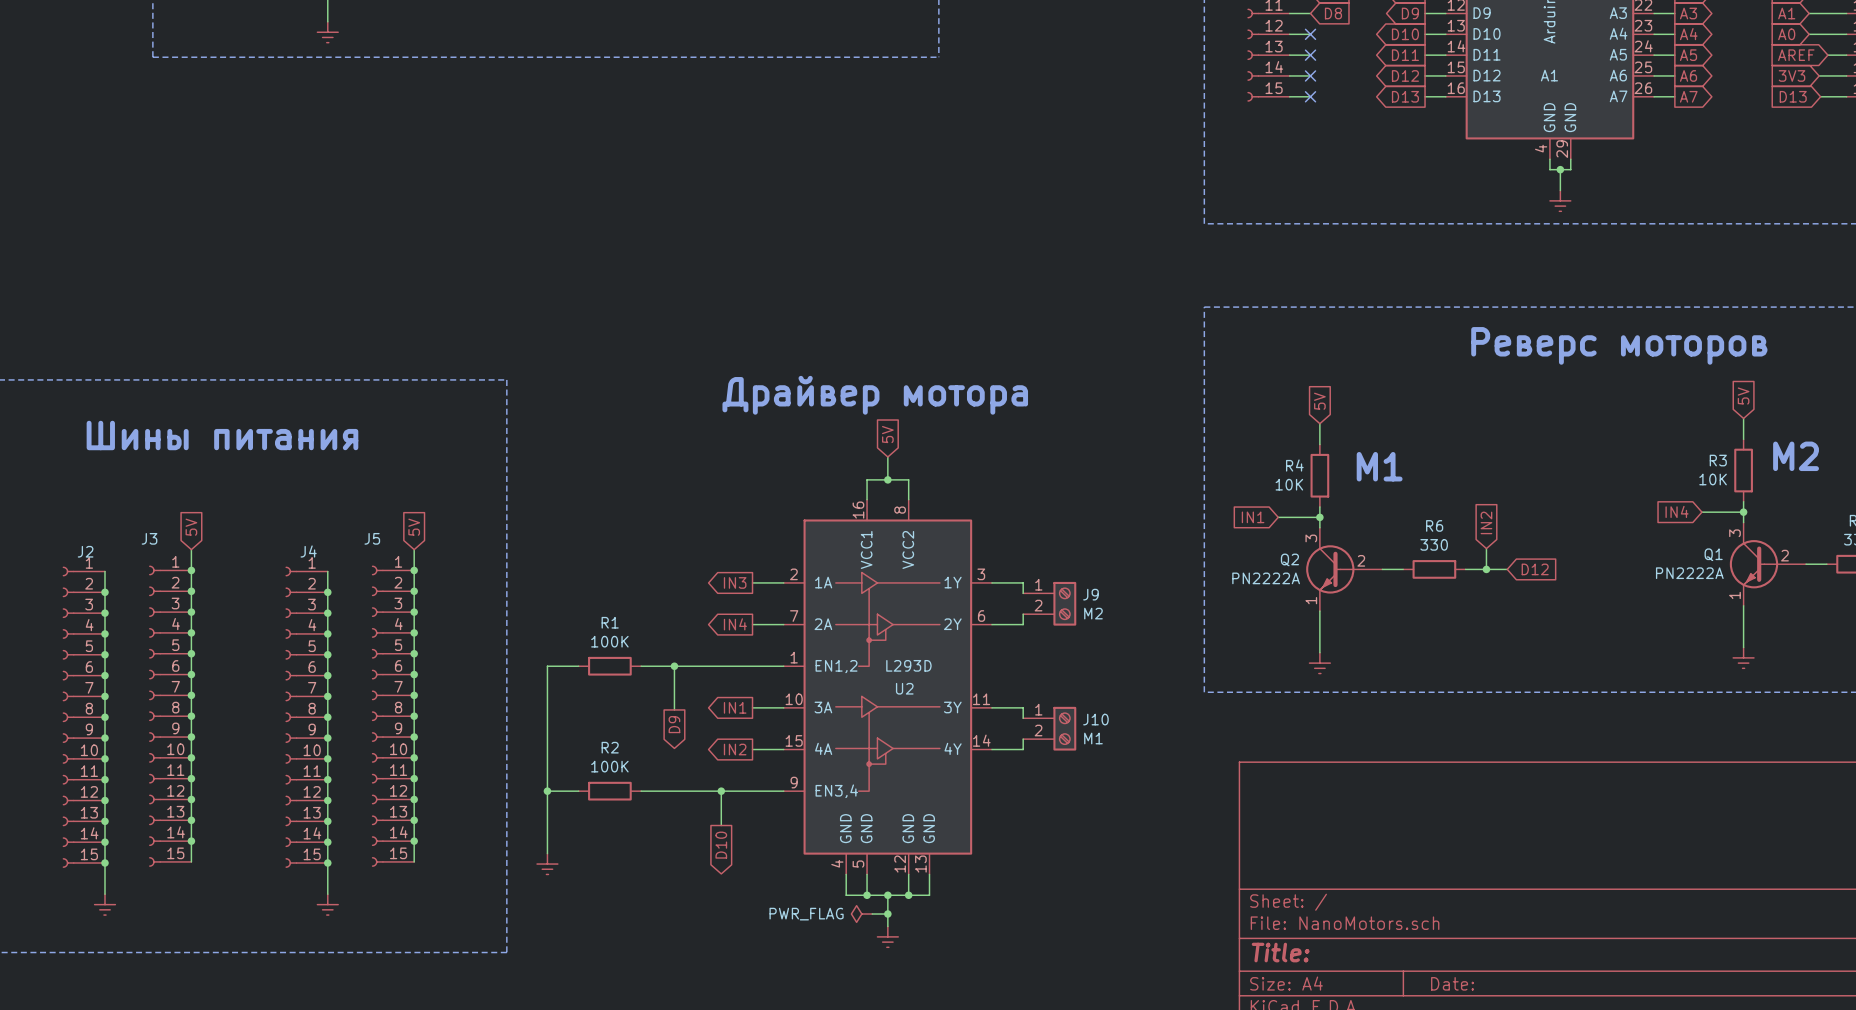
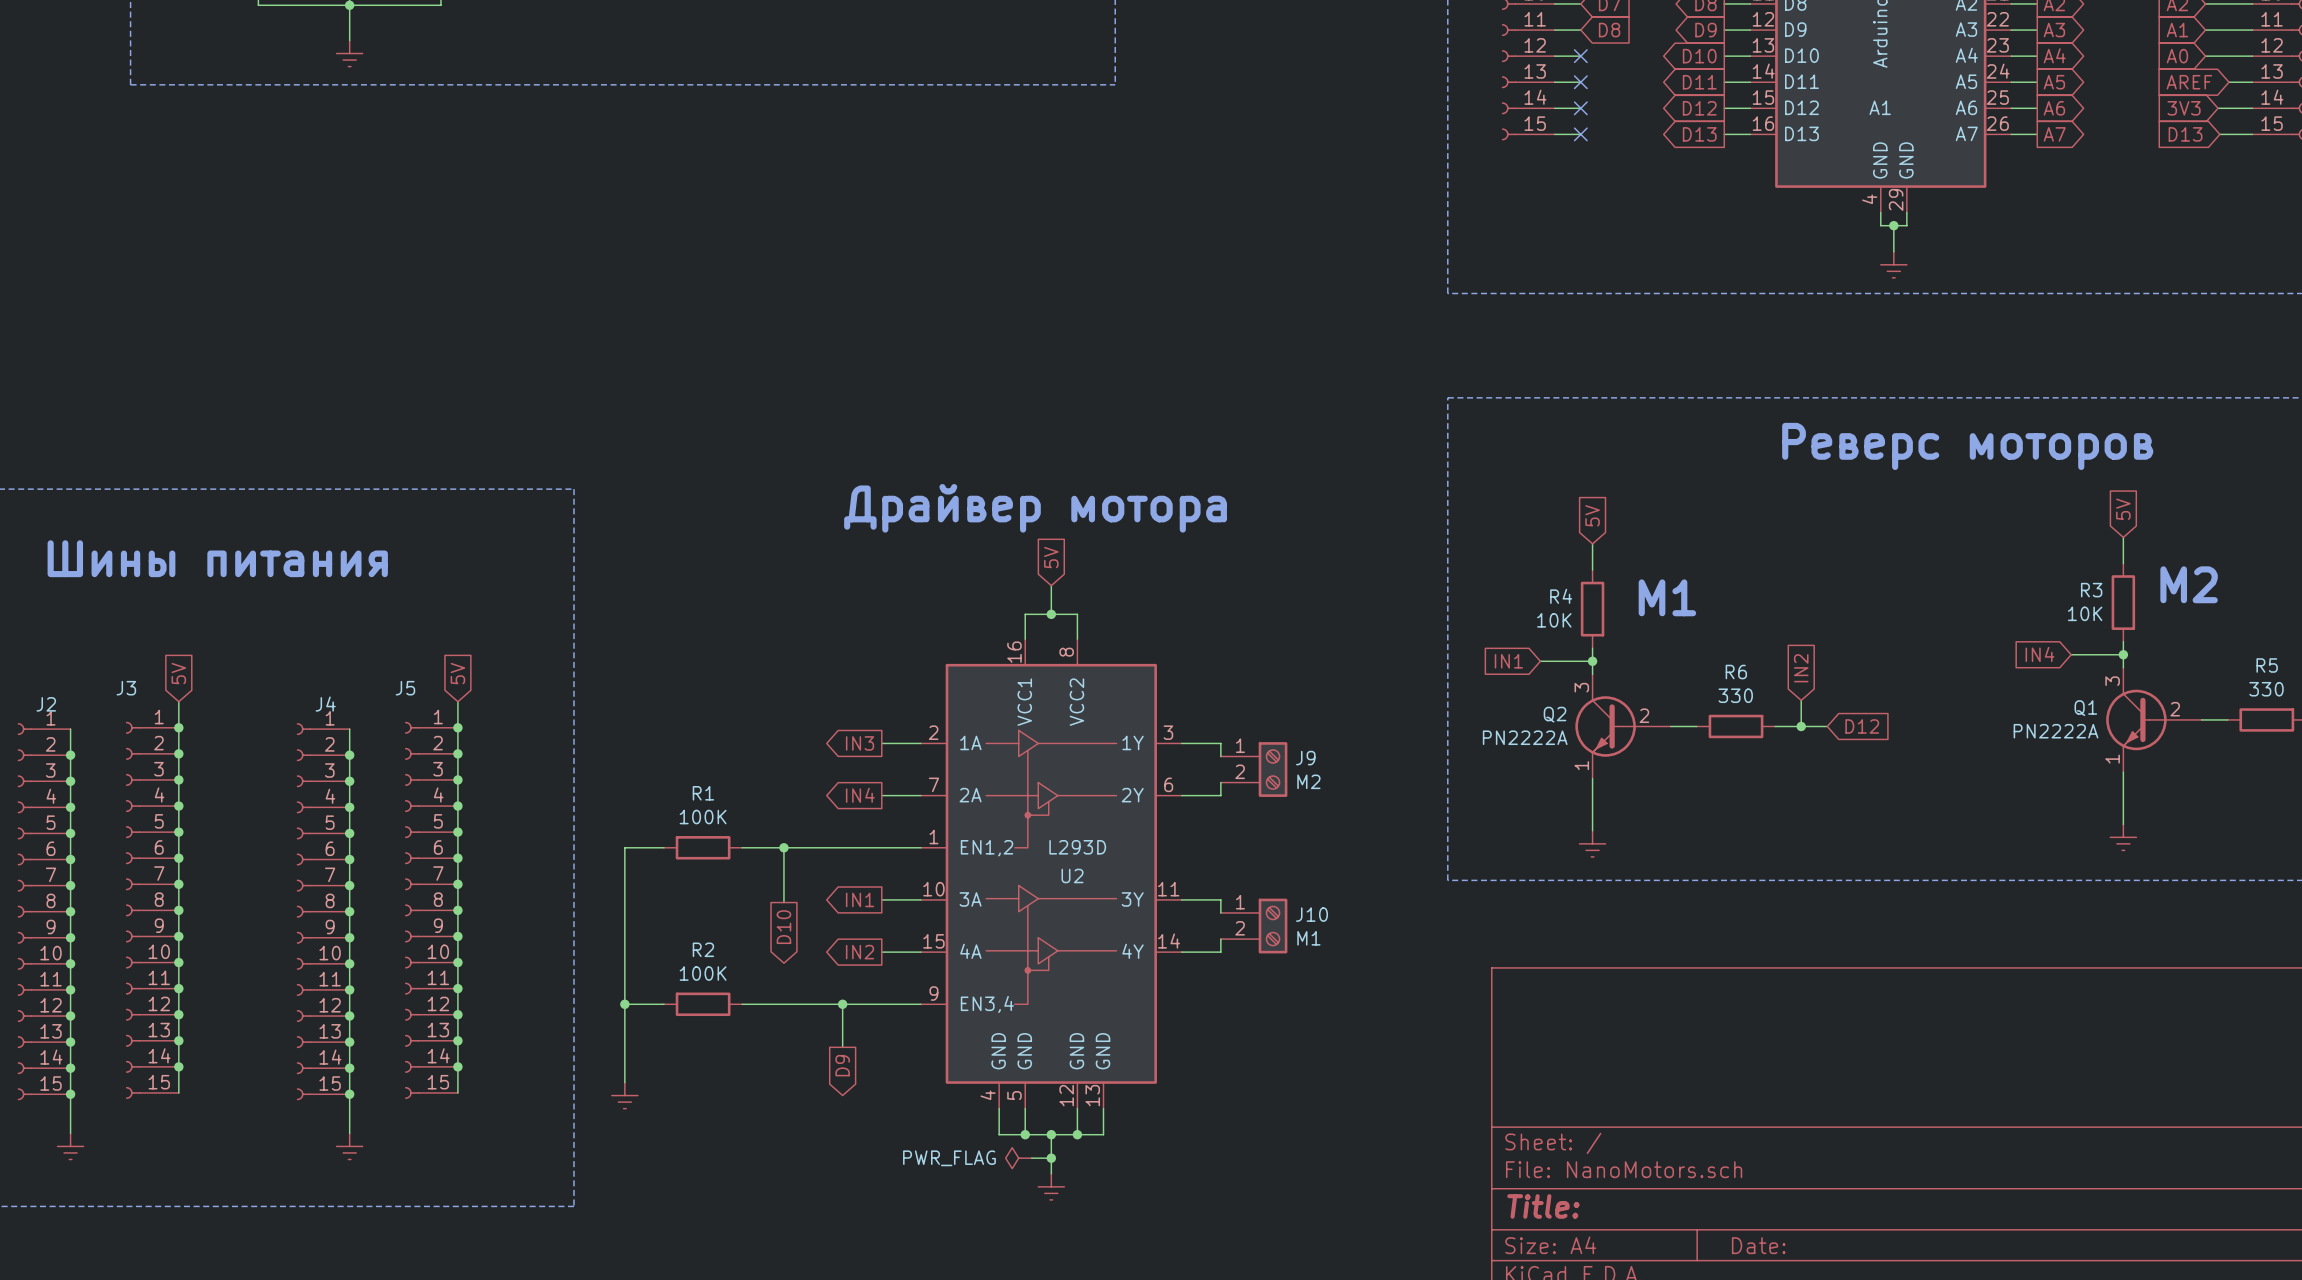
global label: D9 (674, 724) -> D10 (783, 927)
global label: D10 (721, 845) -> D9 (842, 1065)

